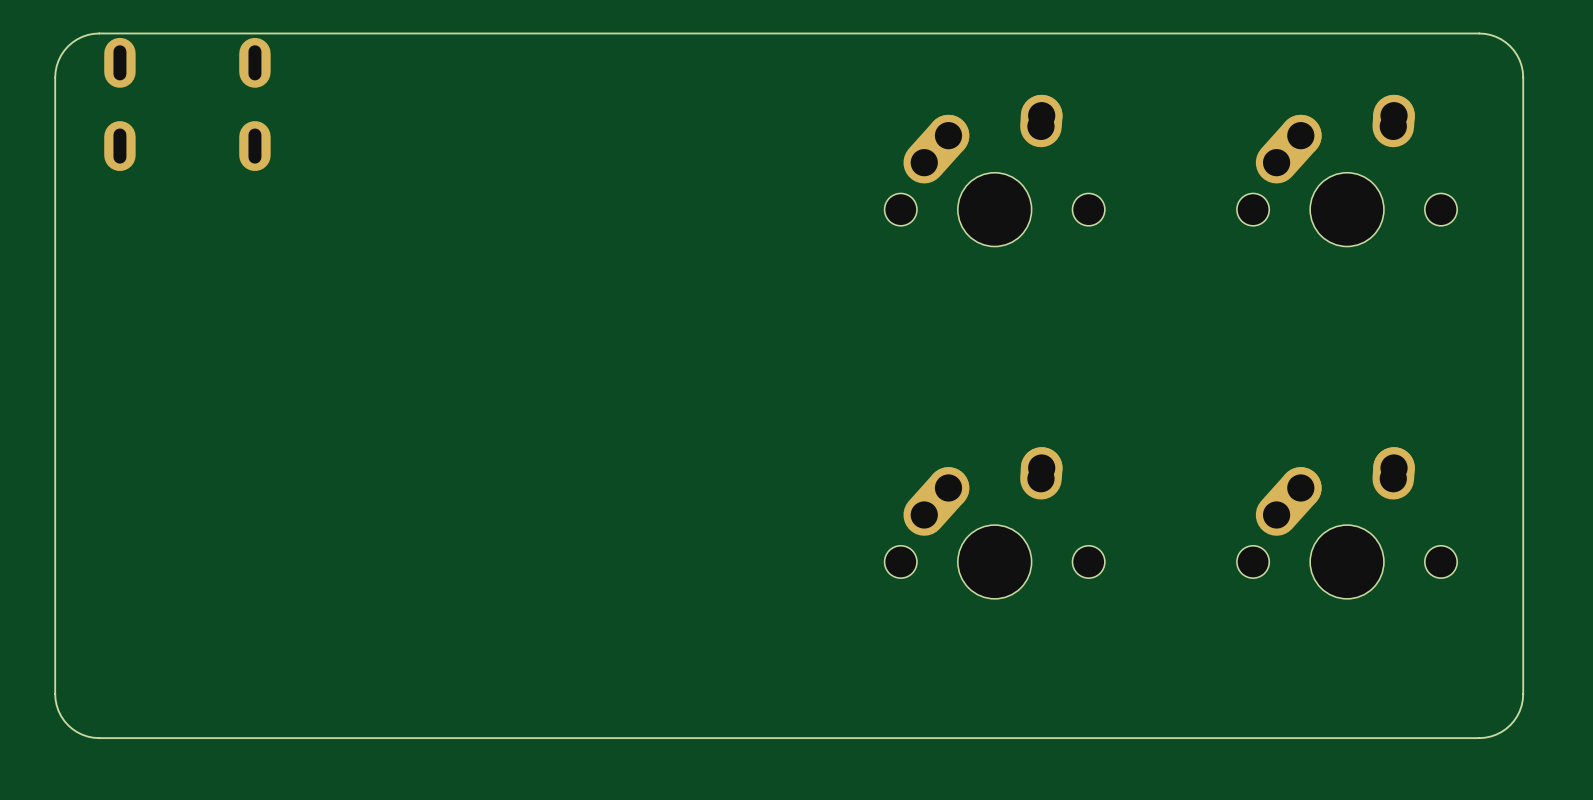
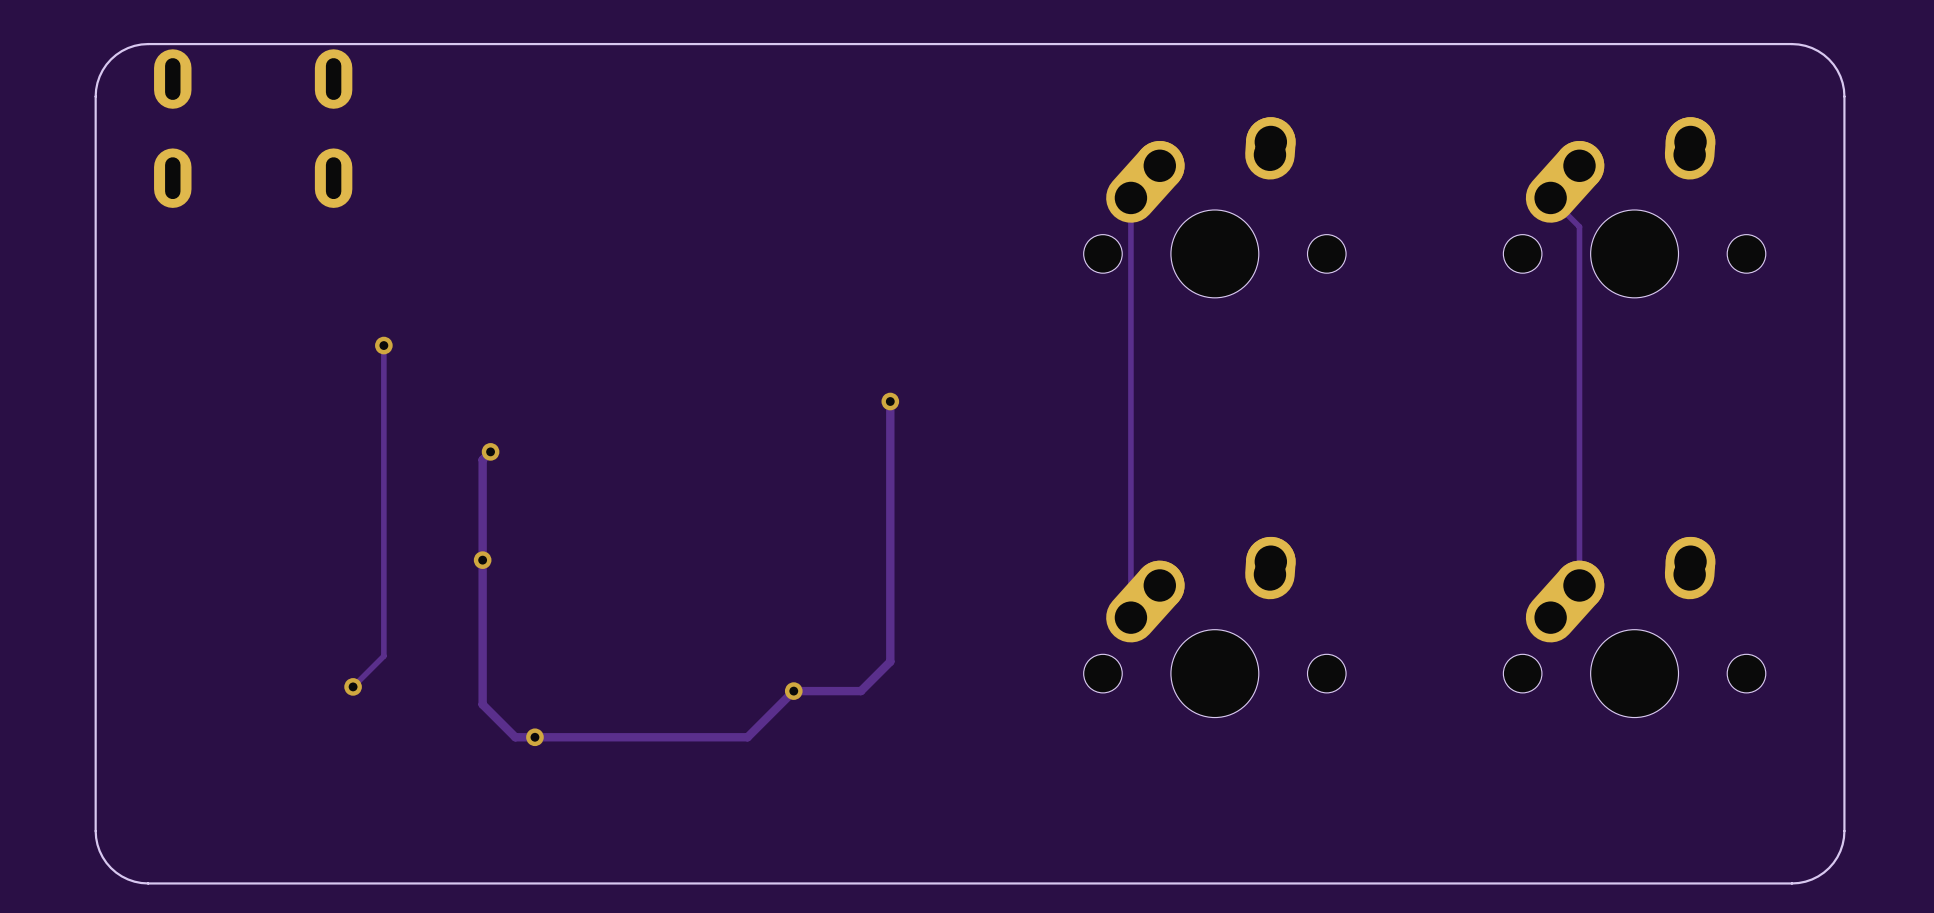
track: none -> (1130, 197) (1130, 617)
track: none -> (1550, 197) (1579, 226) (1579, 585)
via: none -> (383, 345)
track: none -> (383, 348) (383, 656) (353, 686)
track: none -> (890, 401) (890, 661) (860, 691) (793, 691) (747, 737) (515, 737) (482, 704) (482, 459) (490, 451)
via: none -> (890, 401)
via: none -> (490, 451)
via: none -> (482, 560)
via: none -> (353, 686)
via: none -> (793, 691)
via: none -> (534, 737)

